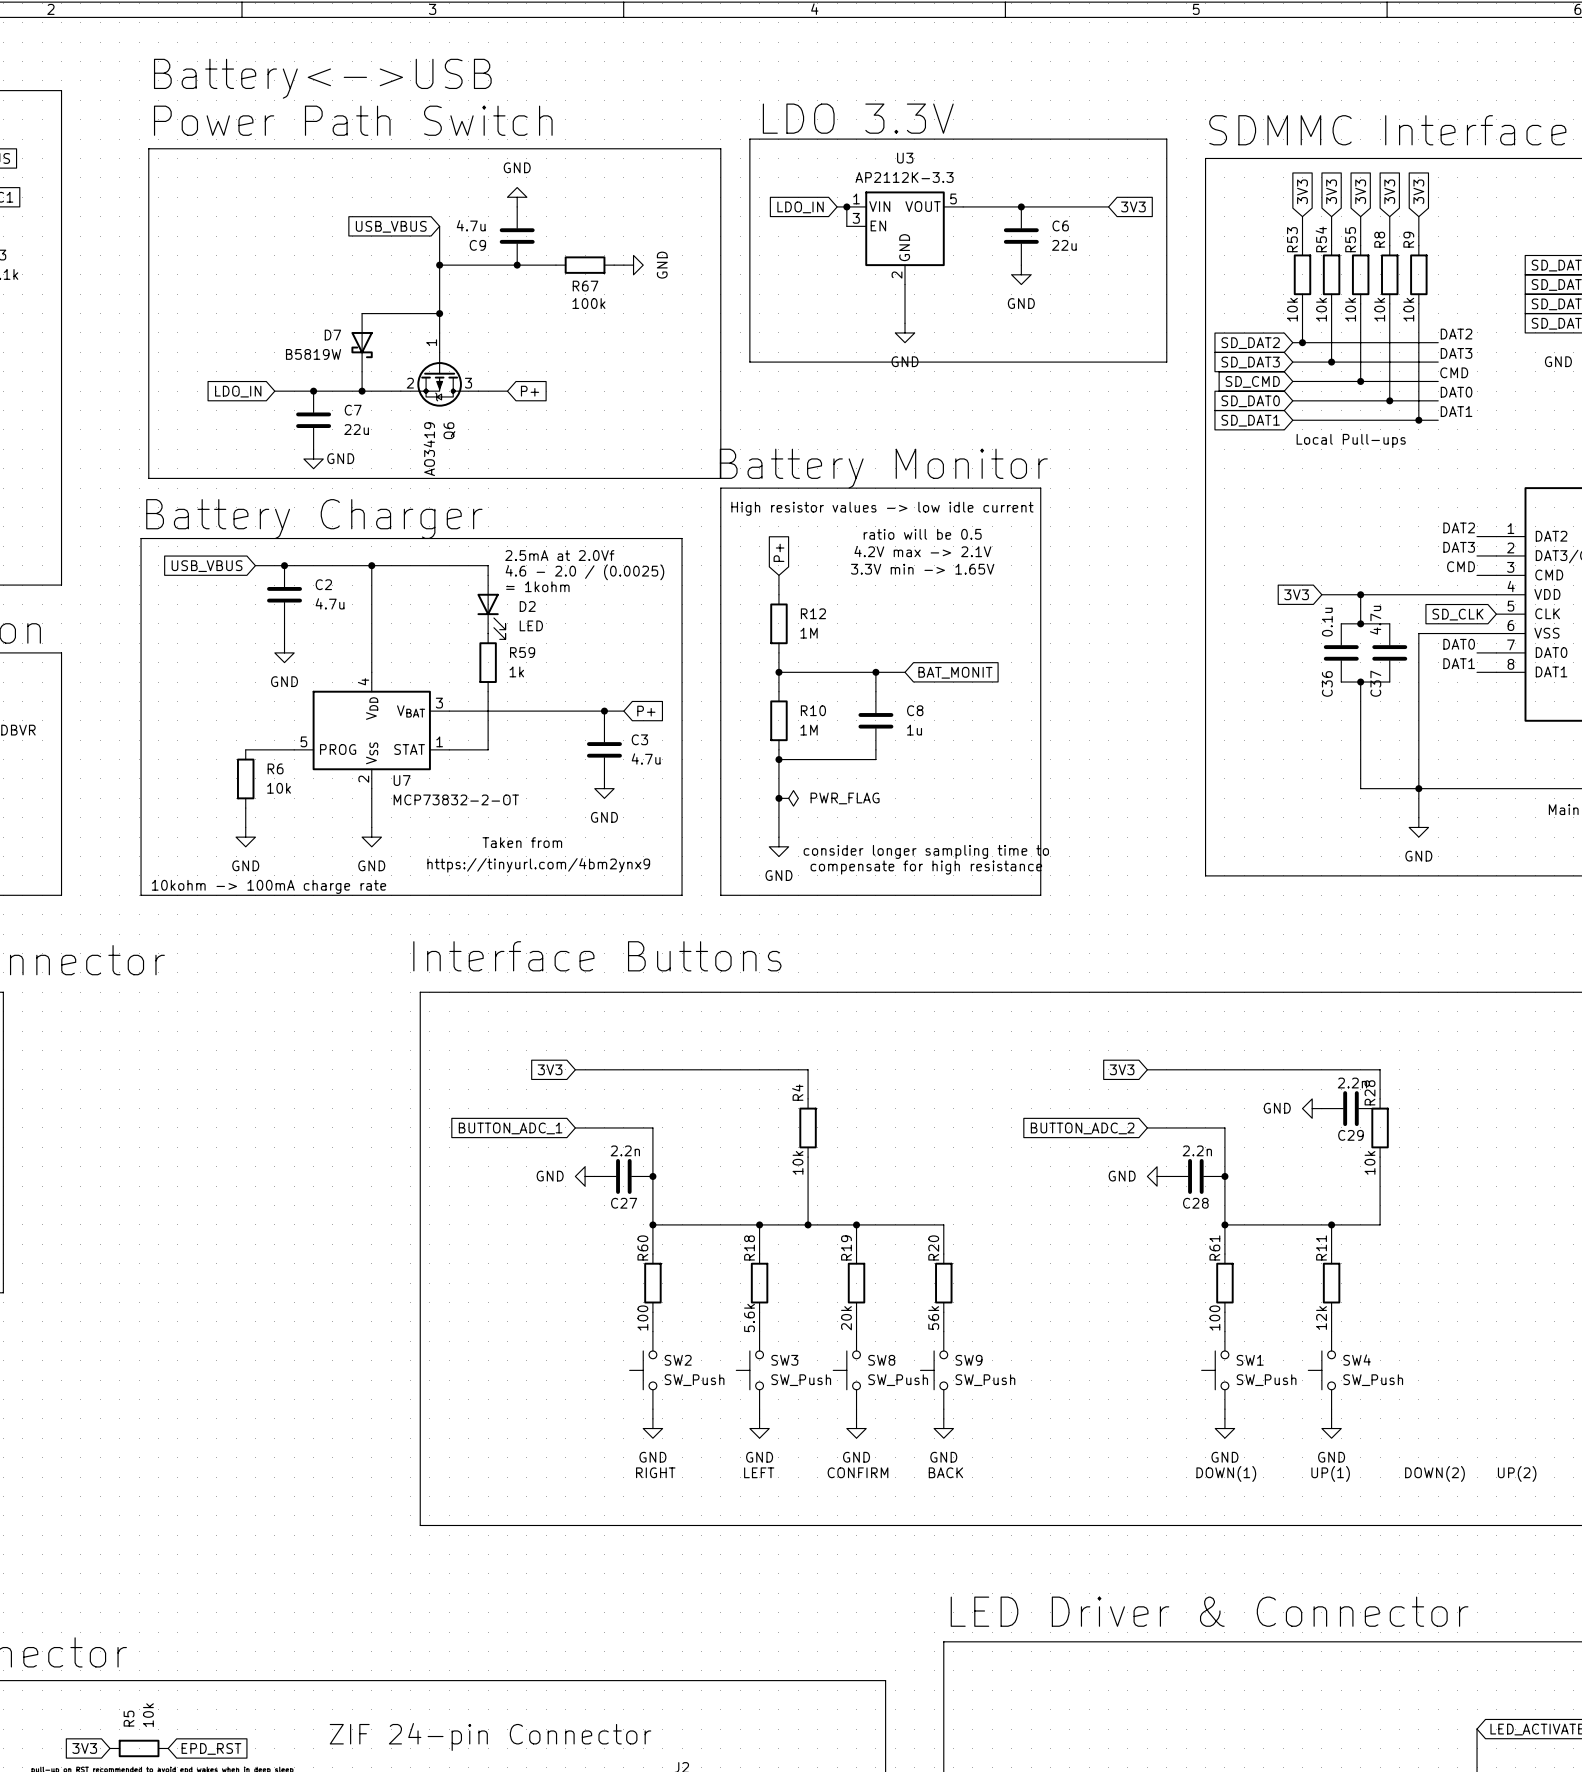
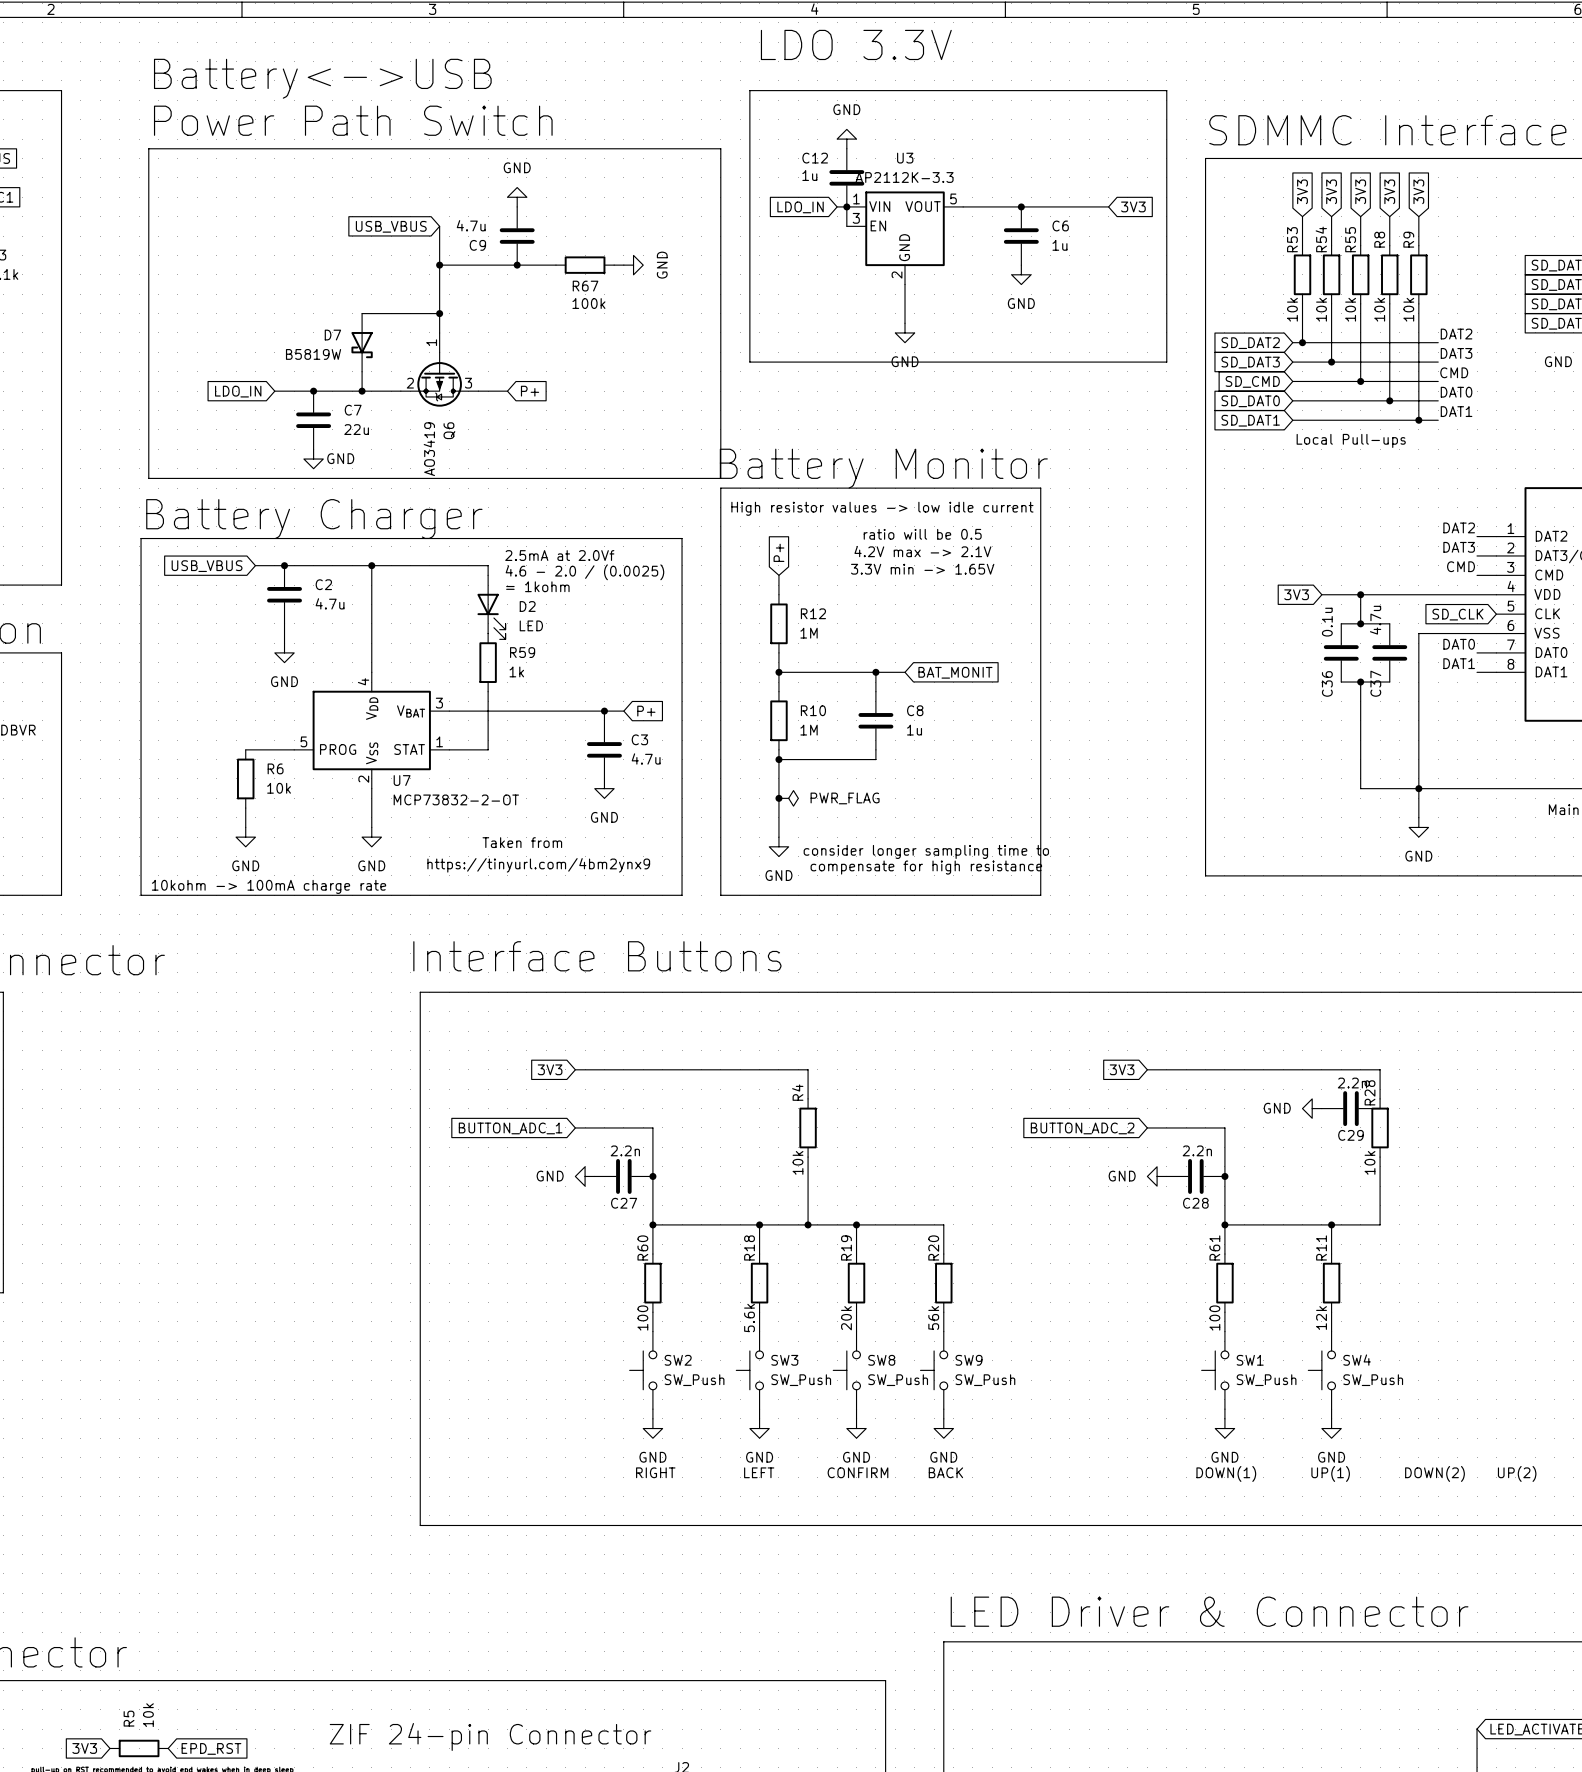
text position: LDO 3.3V (858, 118) -> LDO 3.3V (856, 44)
line: (749, 139) (1166, 139) -> (749, 139) (749, 90) (1166, 90) (1166, 139)
power symbol: none -> GND (846, 139)
C12: none -> 1u (846, 177)
C6 value: 22u (1064, 245) -> 1u (1059, 245)

